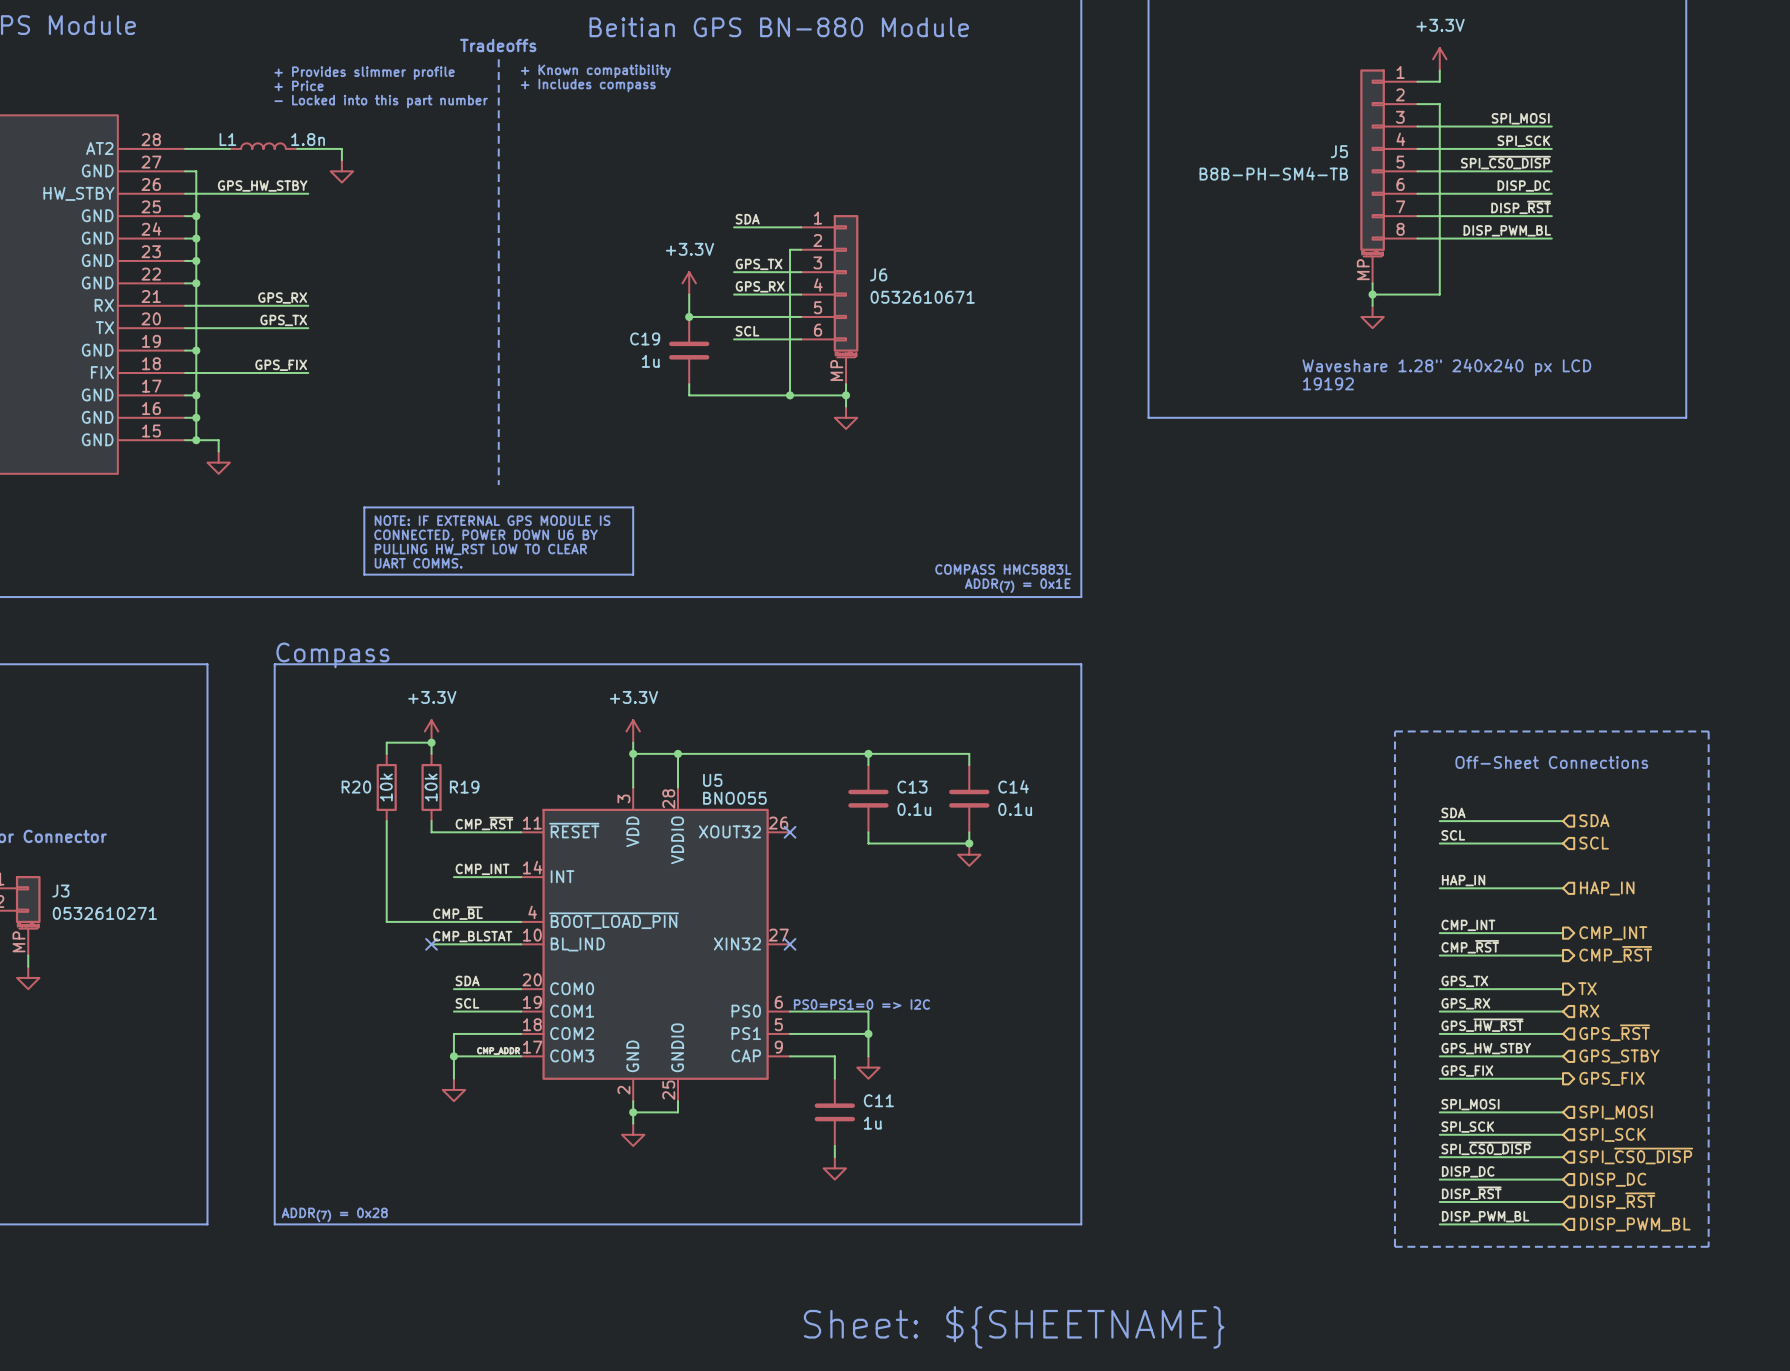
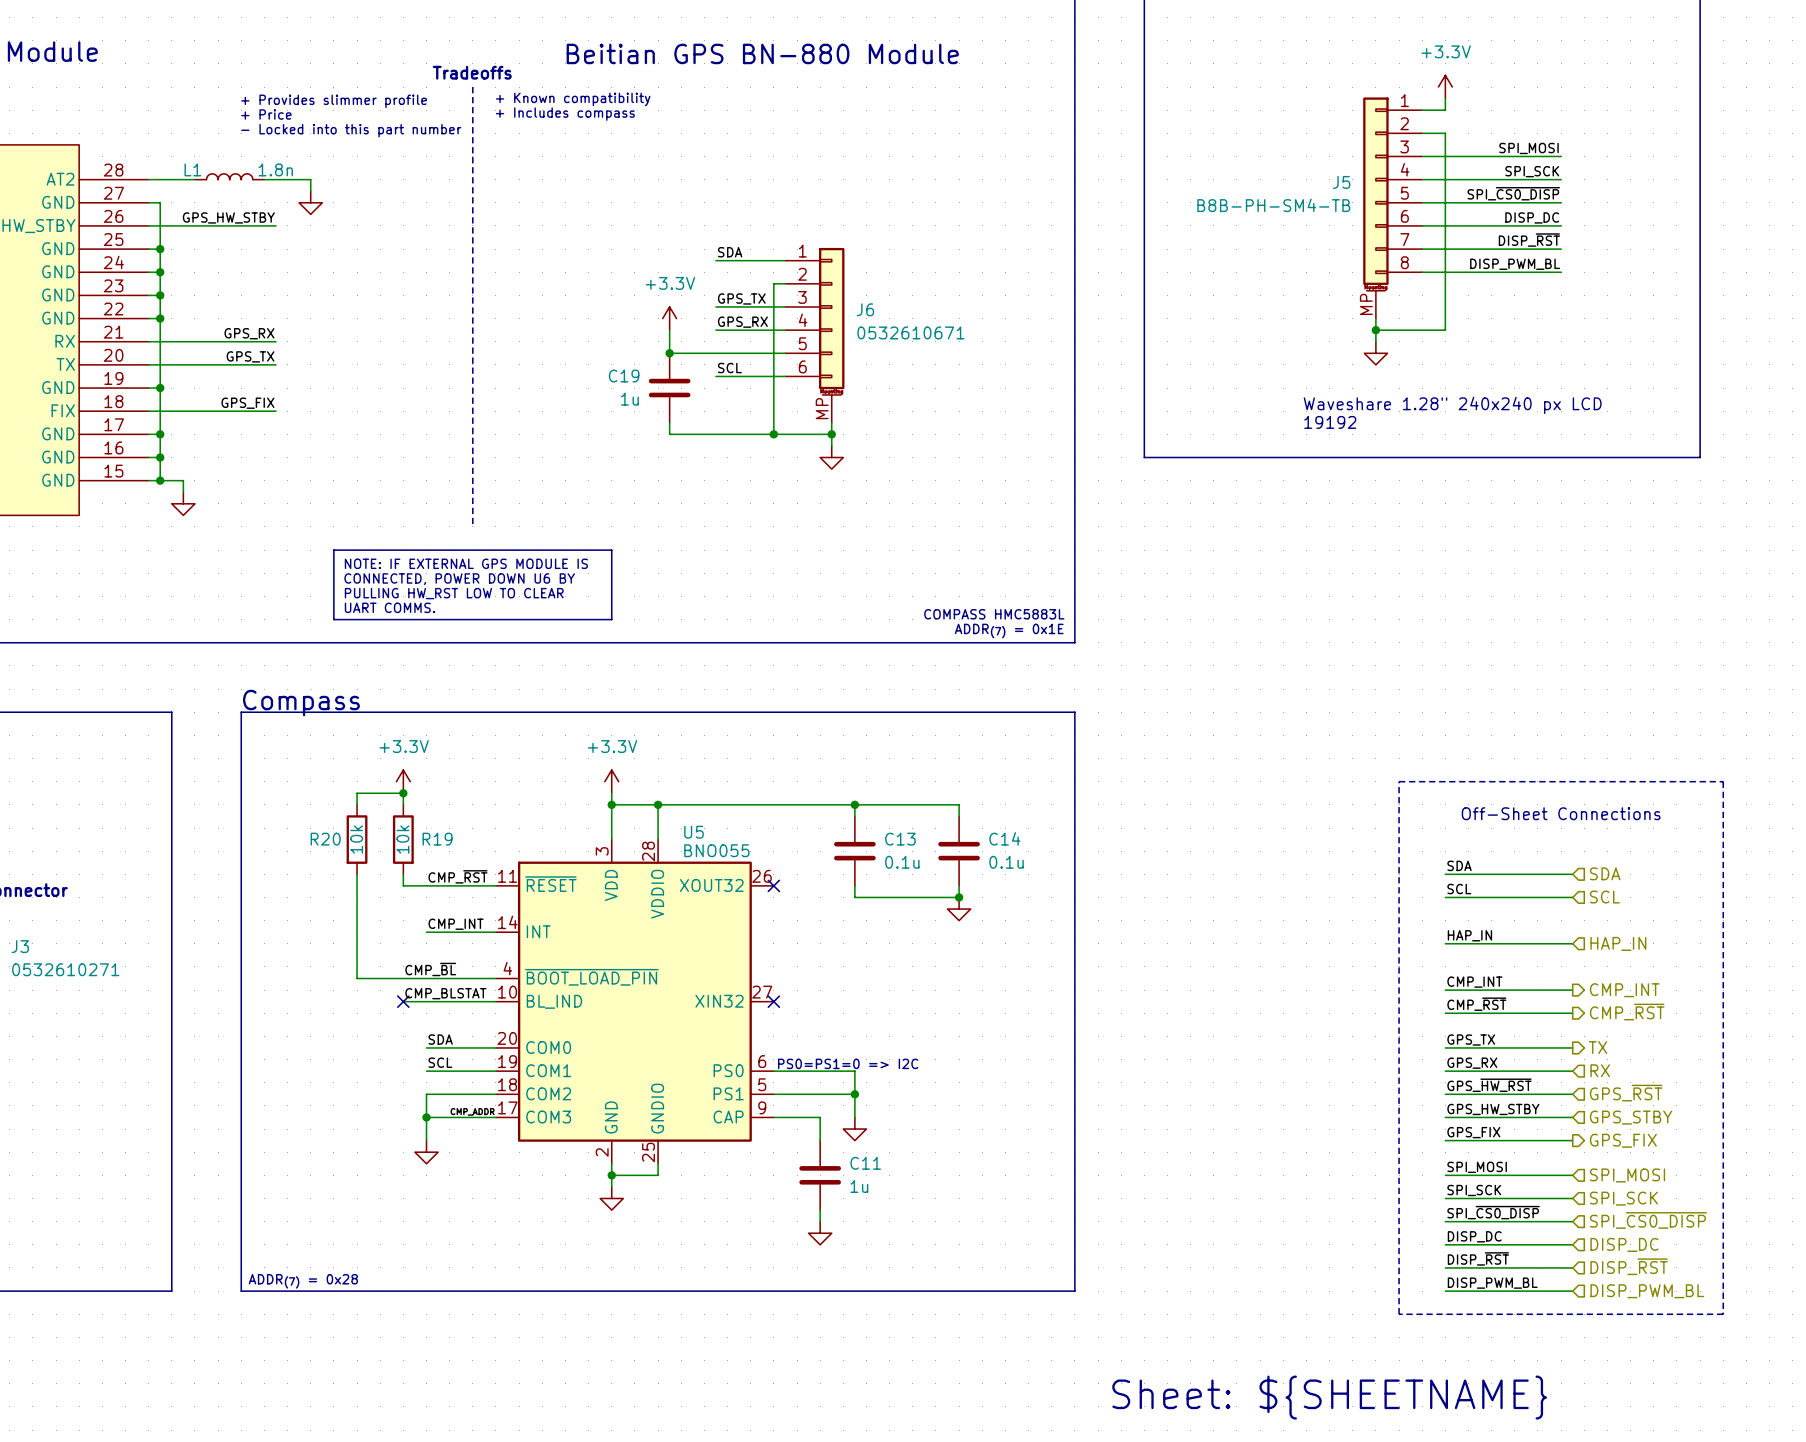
text: Sheet: ${SHEETNAME} (1014, 1327) -> none
text: none -> Sheet: ${SHEETNAME} (1329, 1397)

